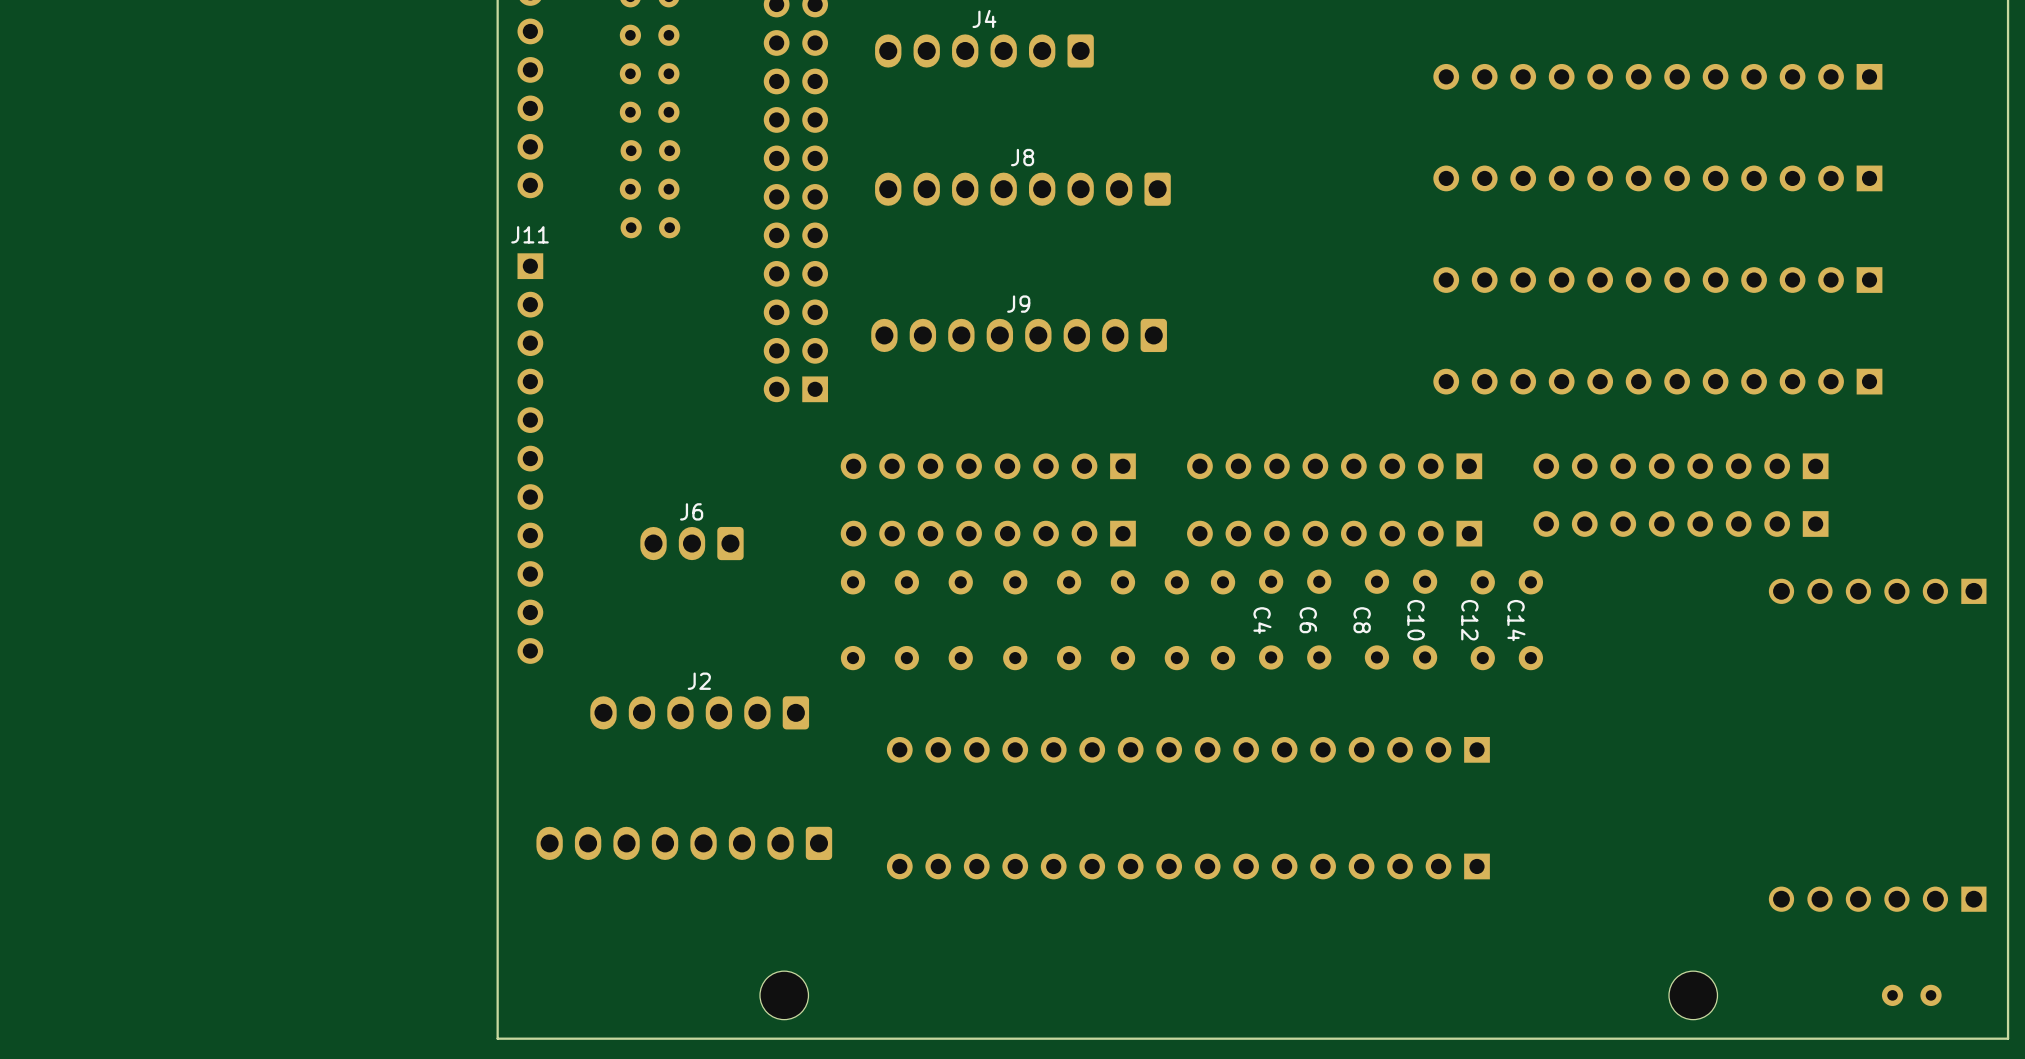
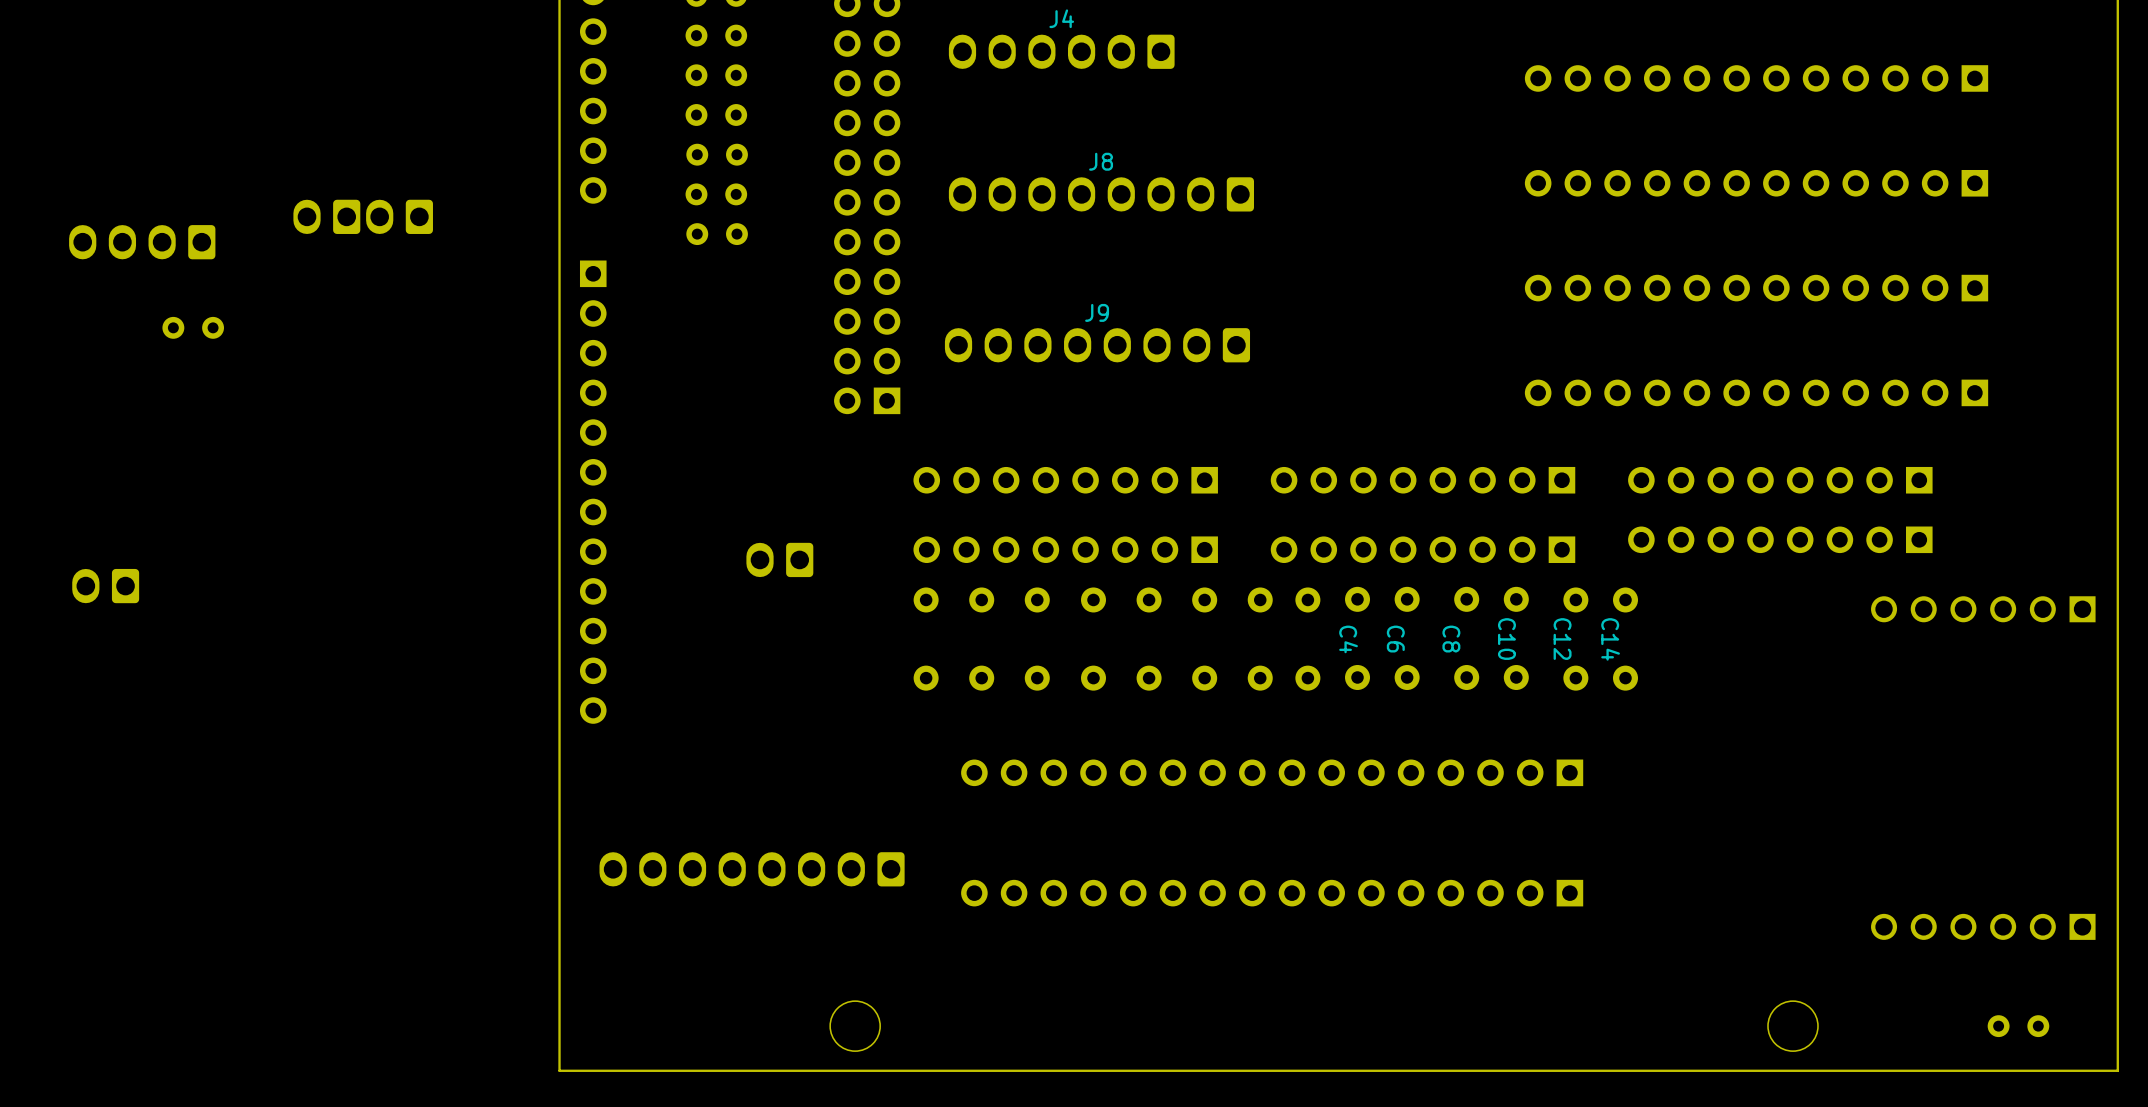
part: none -> (326, 216)
part: none -> (399, 216)
part: none -> (142, 242)
part: none -> (193, 327)
J11: (530, 458) -> none
part: none -> (593, 492)
J6: (691, 543) -> none
part: none -> (105, 586)
J2: (699, 712) -> none

